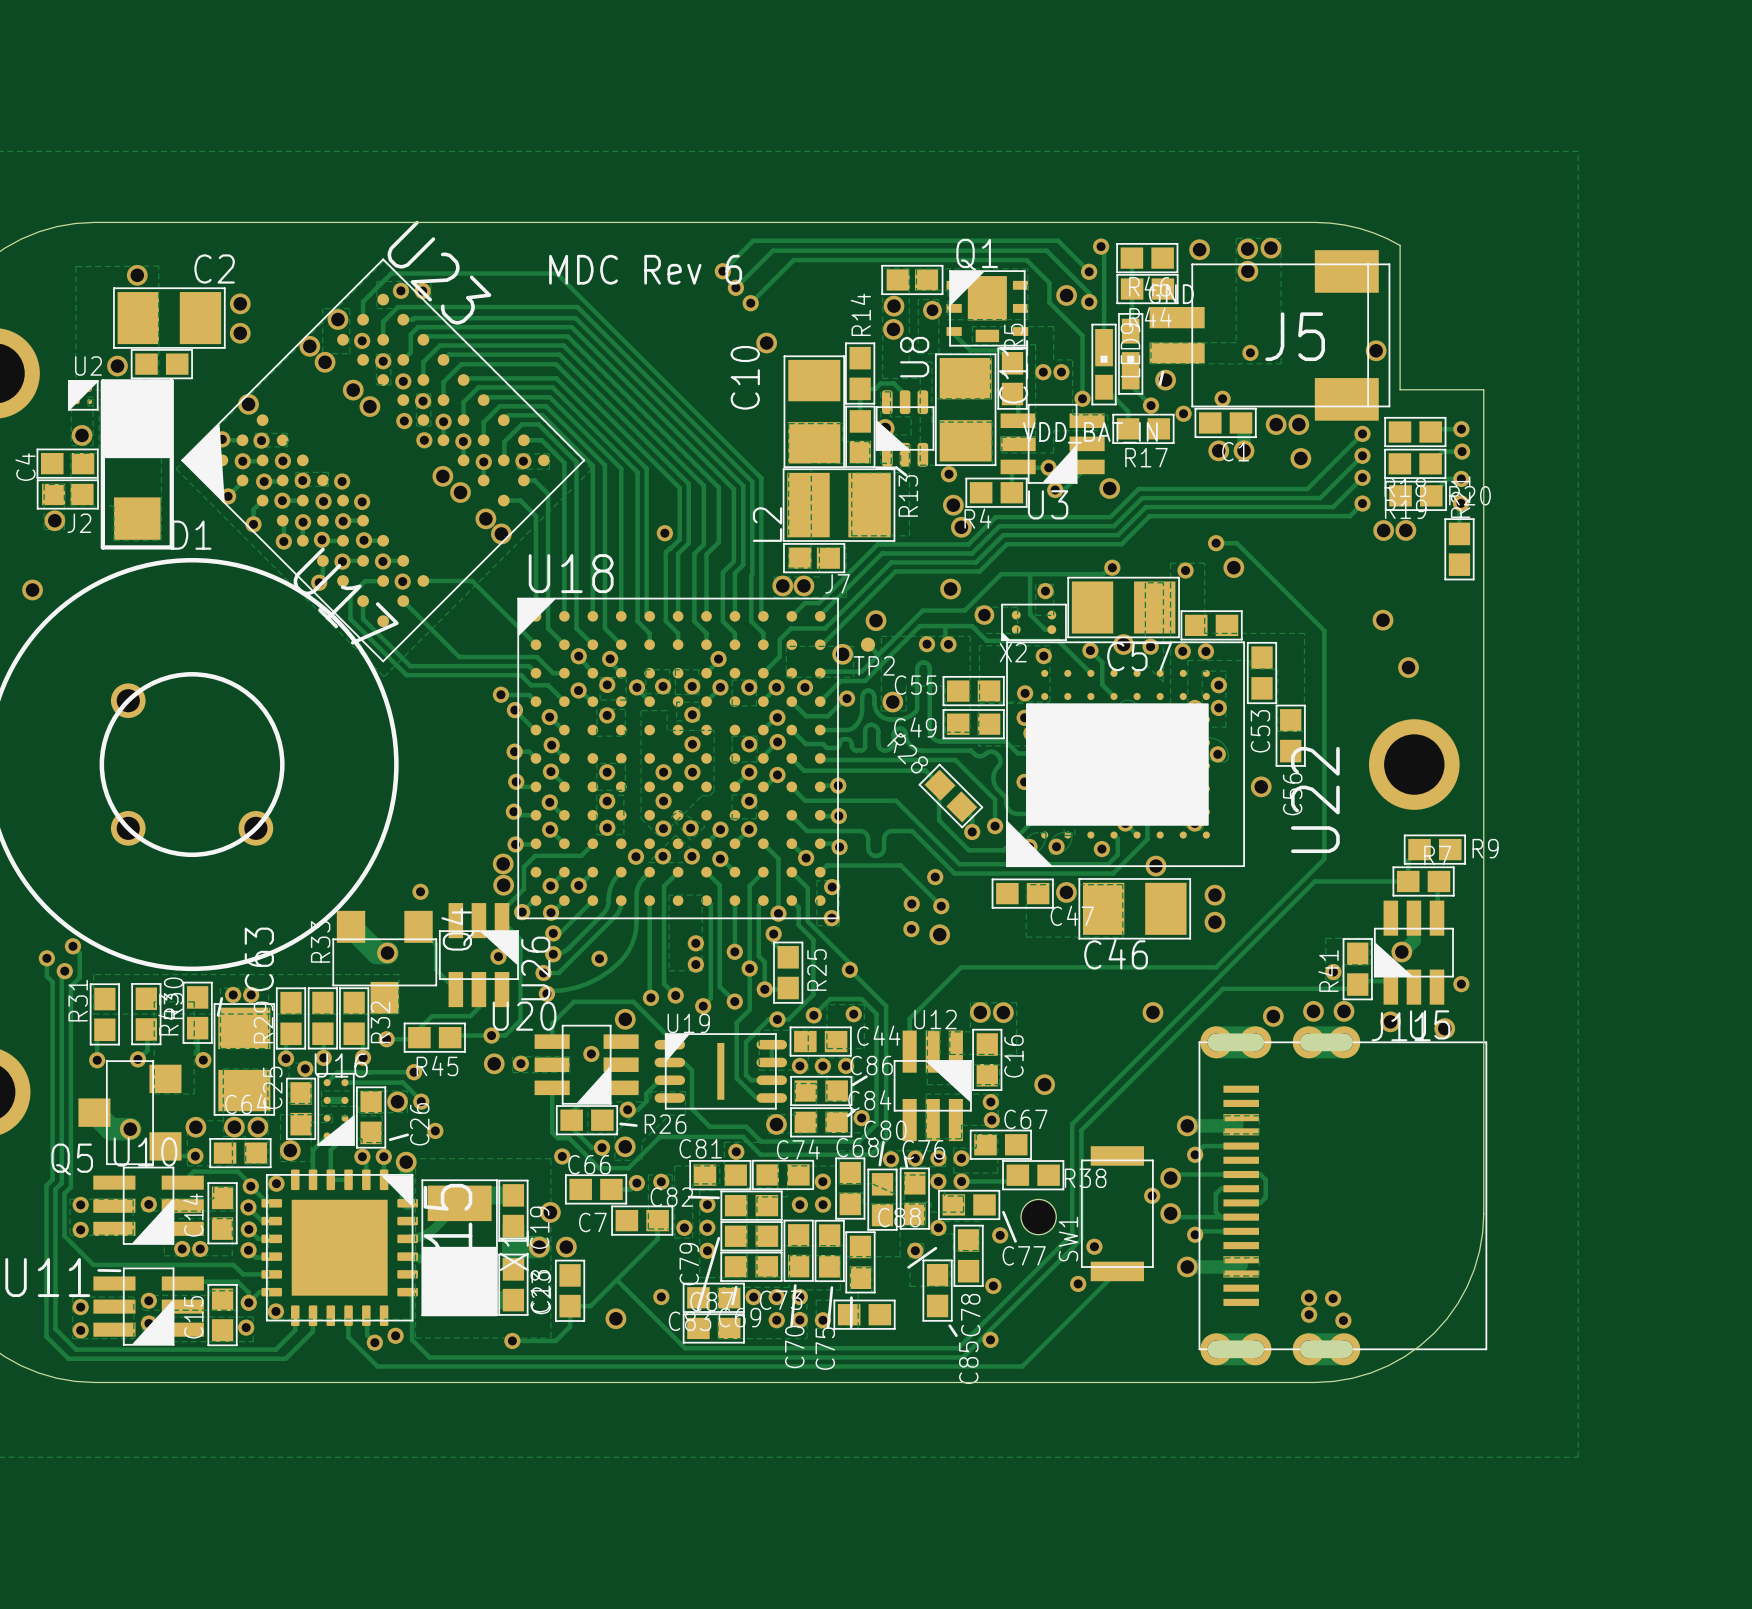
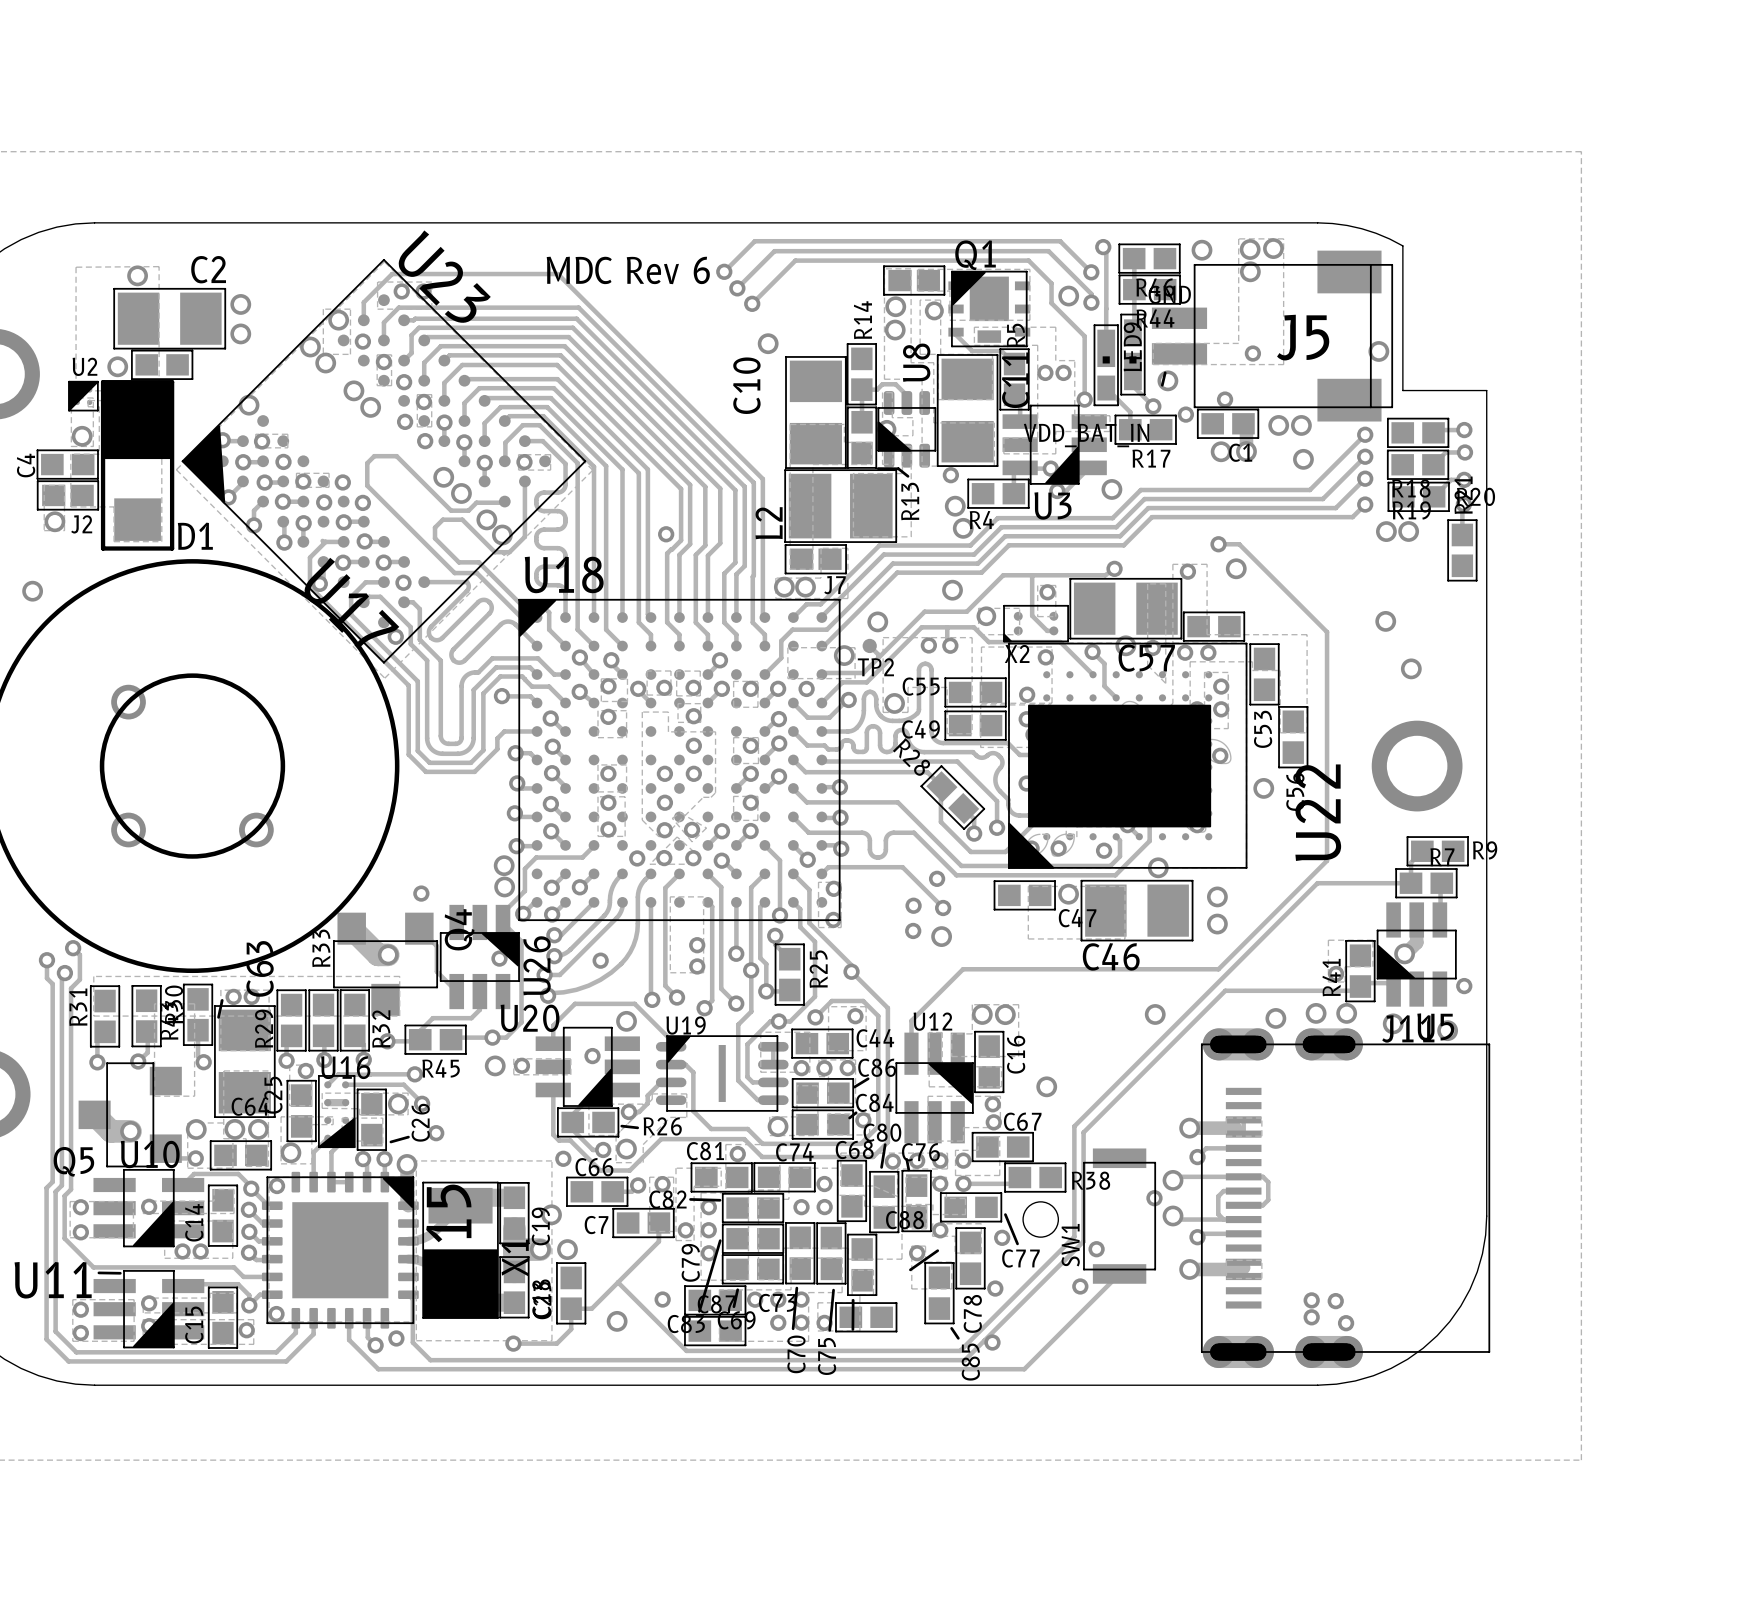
track: (523, 480) (534, 480) (548, 494) (548, 611) -> (524, 481) (524, 536) (509, 552) (494, 552) (462, 519) (442, 519) (435, 527) (435, 538) (458, 562) (478, 562) (522, 605) (542, 605) (549, 612)
track: (564, 483) (564, 517) -> (565, 484) (560, 491) (540, 493) (536, 500) (536, 506) (540, 510) (560, 511) (565, 519)
track: (503, 500) (520, 500) (535, 516) (535, 616) -> (503, 502) (476, 502) (468, 510) (451, 510) (396, 456) (374, 456) (367, 463) (367, 485) (454, 573) (476, 573) (521, 617) (537, 617)
track: (564, 520) (564, 554) -> (565, 521) (560, 529) (540, 530) (536, 537) (536, 543) (540, 547) (560, 548) (565, 556)
via: (321, 539) -> none
track: (564, 557) (564, 591) -> (565, 558) (560, 566) (540, 567) (536, 574) (536, 580) (540, 584) (560, 585) (565, 593)
track: (466, 580) (472, 580) (514, 623) -> (489, 602) (491, 607) (490, 612) (452, 650) (451, 656) (454, 661) (459, 662) (464, 661) (502, 622) (509, 621) (515, 624)
track: none -> (466, 582) (468, 585) (467, 590) (429, 628) (428, 633) (431, 637) (435, 640) (440, 639) (478, 601) (483, 599) (489, 602)
track: (363, 601) (363, 618) (410, 666) (495, 666) -> (363, 602) (369, 596) (380, 596) (410, 627) (410, 644) (427, 660) (427, 740) (430, 747) (436, 752) (459, 753) (470, 747) (473, 738) (473, 689) (496, 667)
track: (403, 601) (459, 657) (491, 657) -> (404, 602) (412, 602) (419, 609) (419, 639) (440, 660) (440, 735) (444, 742) (457, 743) (461, 739) (461, 686) (463, 679) (470, 673) (478, 672) (492, 658)
track: (350, 613) (350, 619) (406, 675) (499, 675) -> (351, 614) (417, 681) (417, 750) (429, 762) (470, 762) (483, 750) (483, 693) (500, 676)
via: none -> (395, 636)
track: (514, 710) (534, 730) -> (325, 541) (309, 557) (309, 586) (408, 685) (408, 754) (425, 771) (474, 771) (497, 749) (497, 738) (504, 731) (535, 731)
via: (514, 710) -> none

